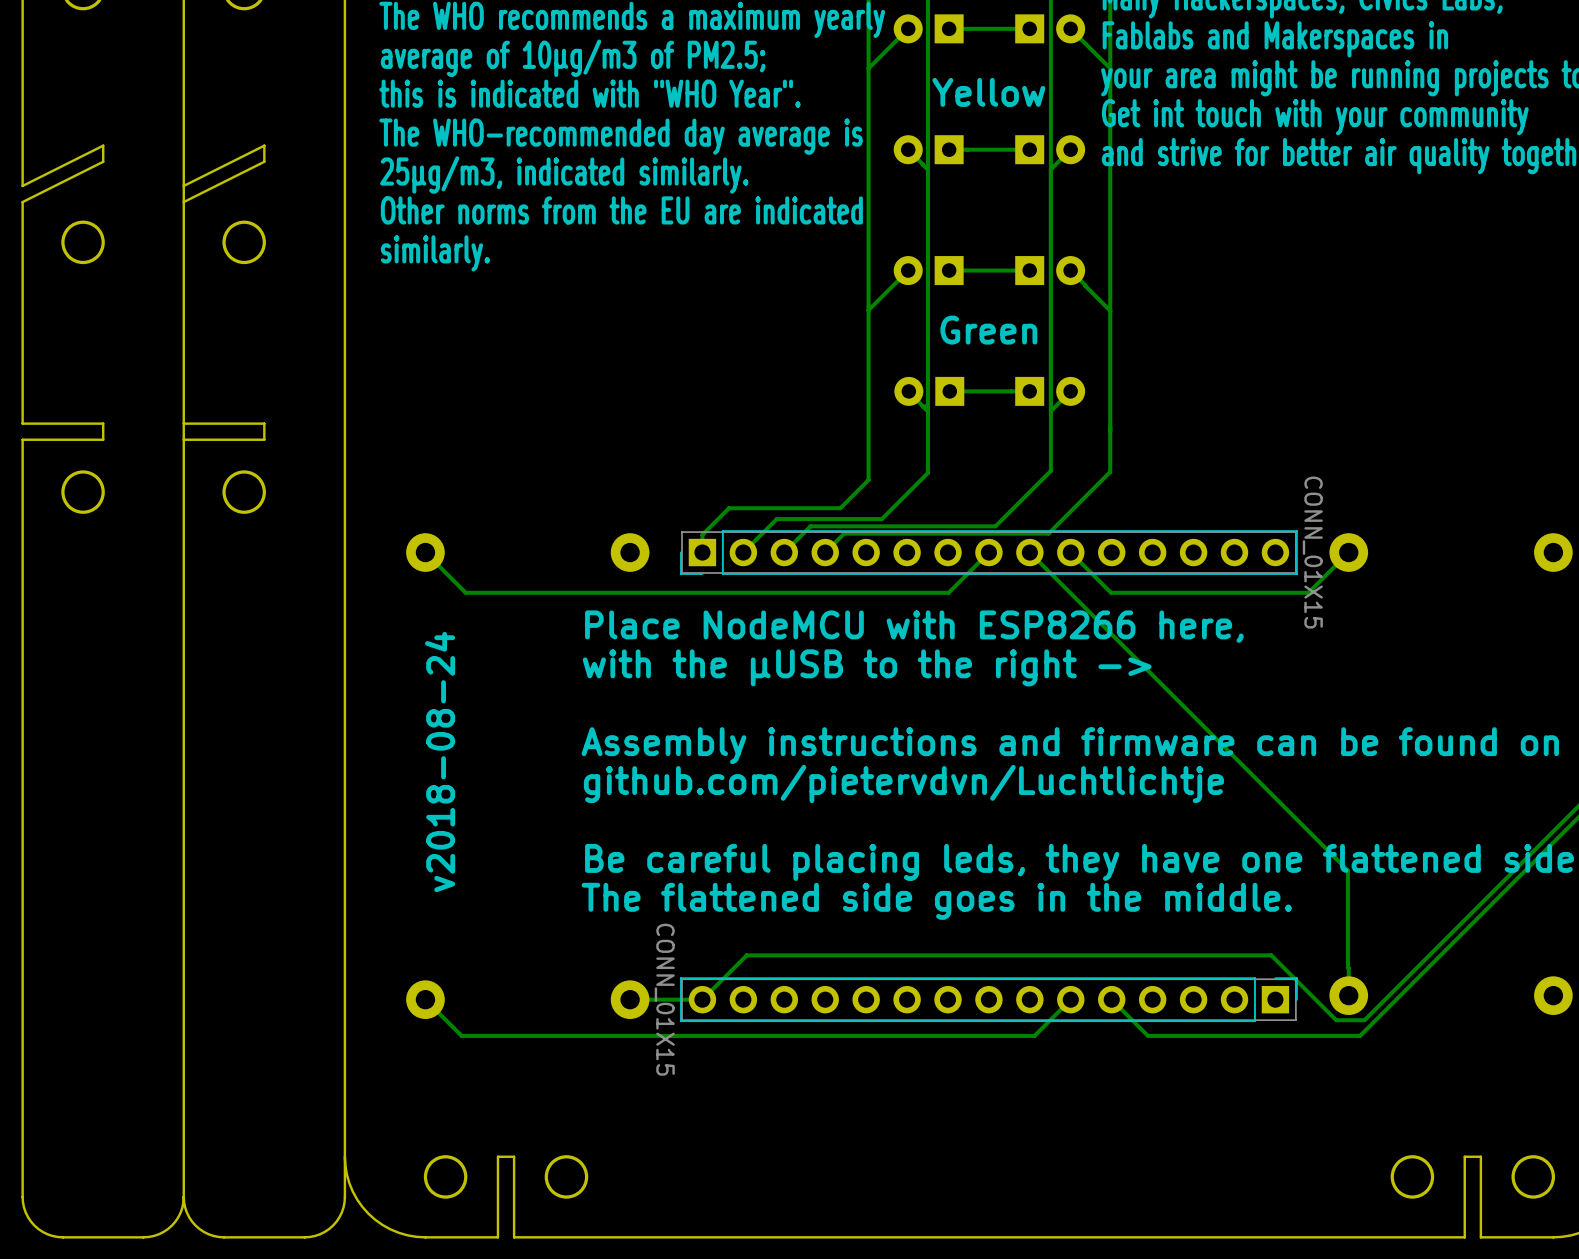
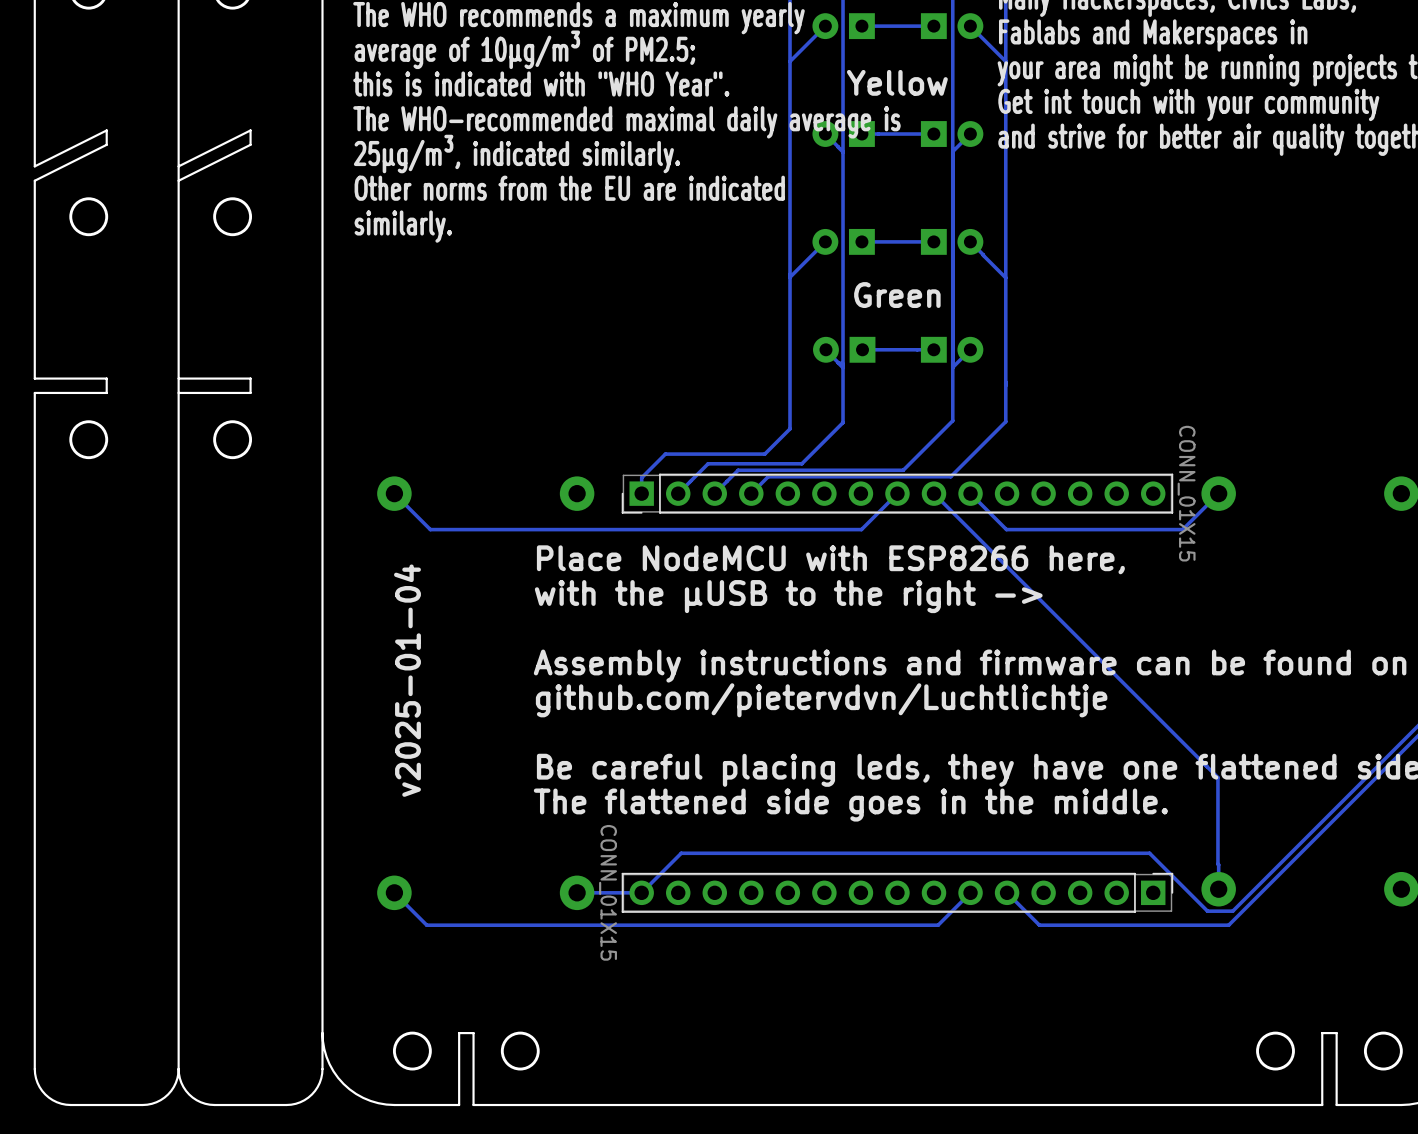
text: average of 10µg/m3 of PM2.5; (573, 58) -> average of 10µg/m³ of PM2.5; (524, 49)
text: The WHO-recommended day average is (621, 136) -> The WHO-recommended maximal daily average is (626, 122)
text: 25µg/m3, indicated similarly. (564, 174) -> 25µg/m³, indicated similarly. (517, 154)
text: v2018-08-24 (440, 762) -> v2025-01-04 (407, 680)

